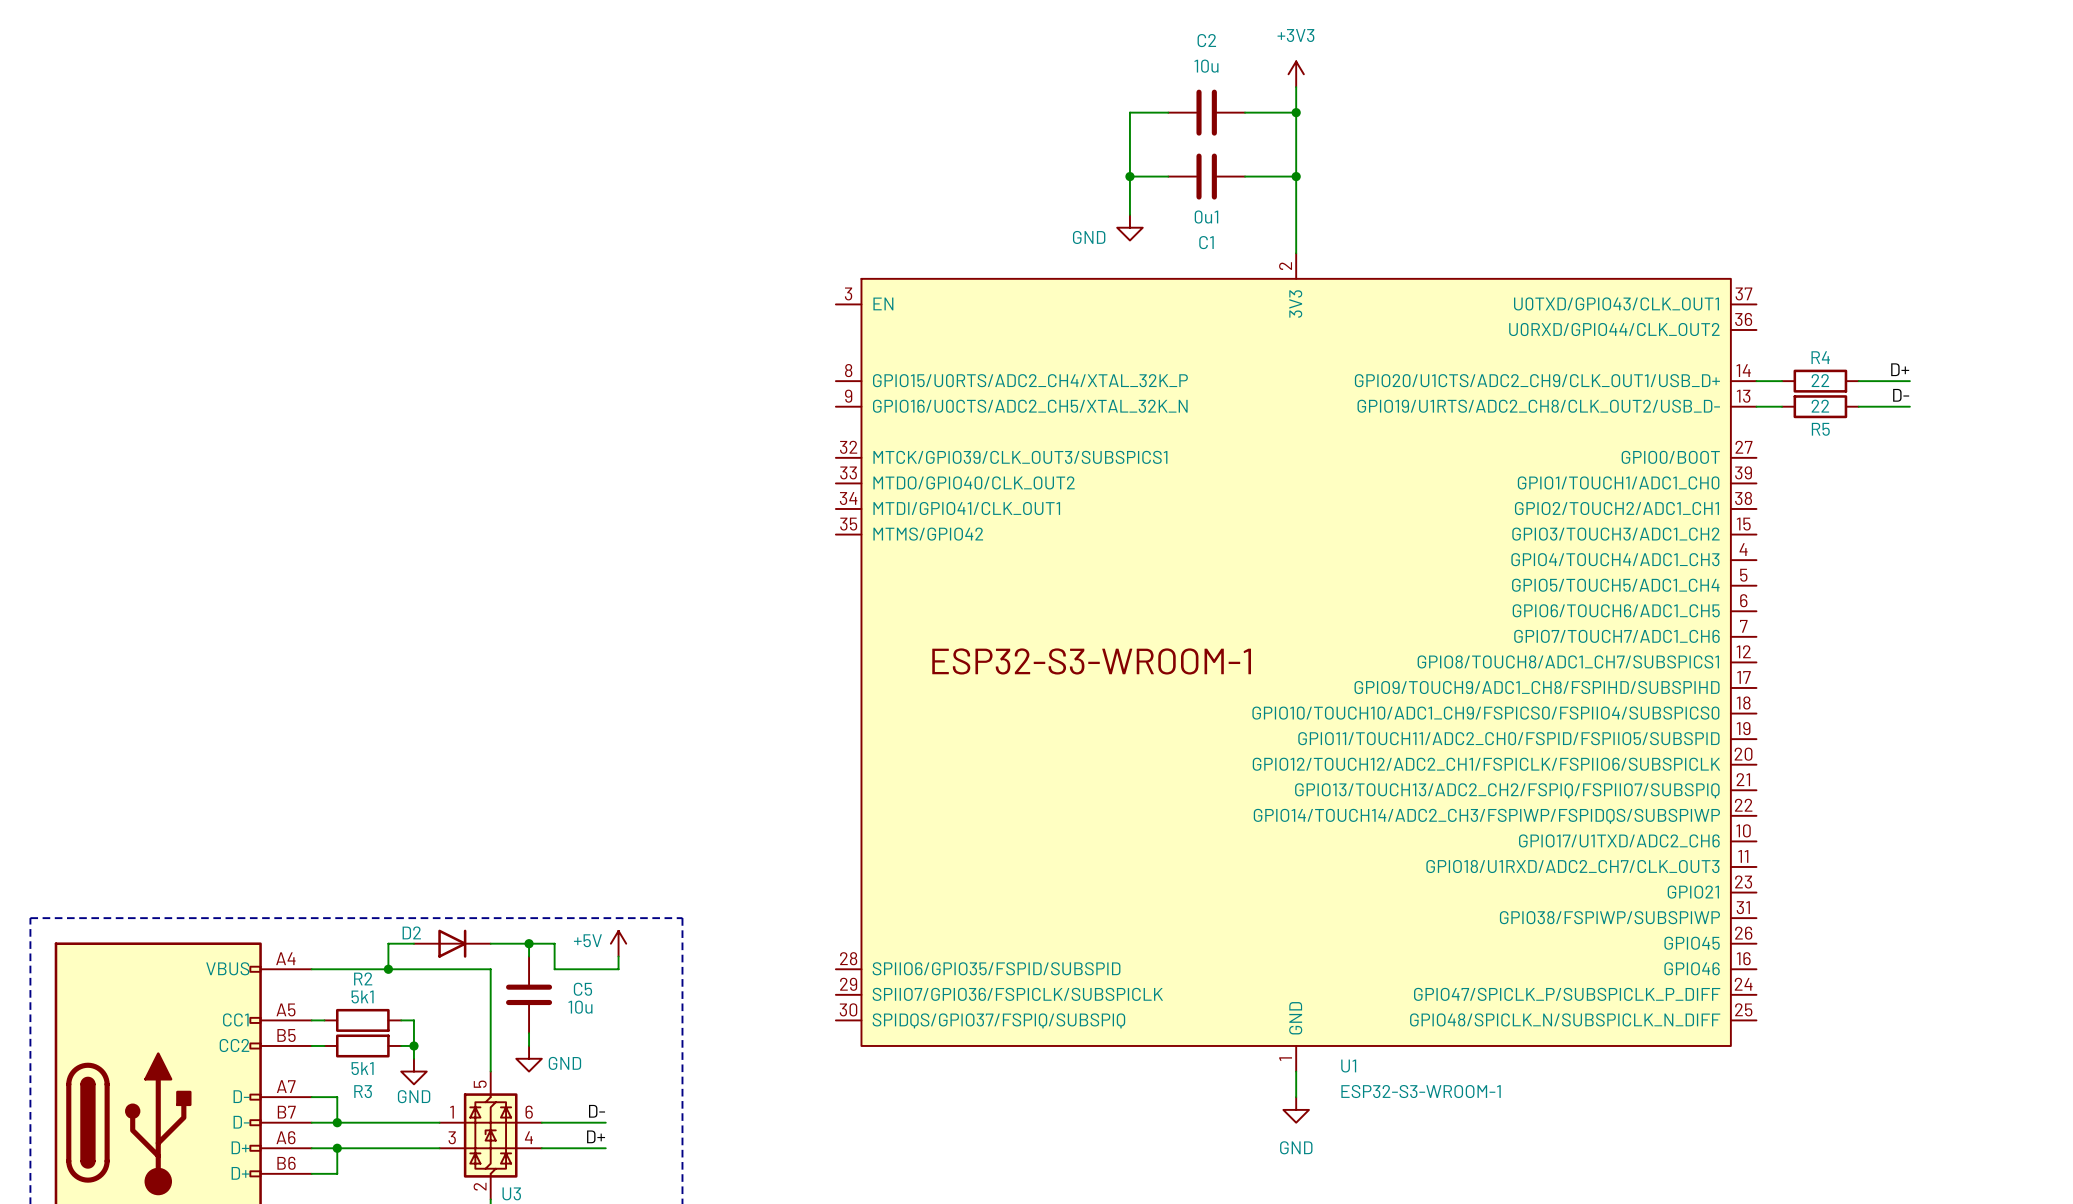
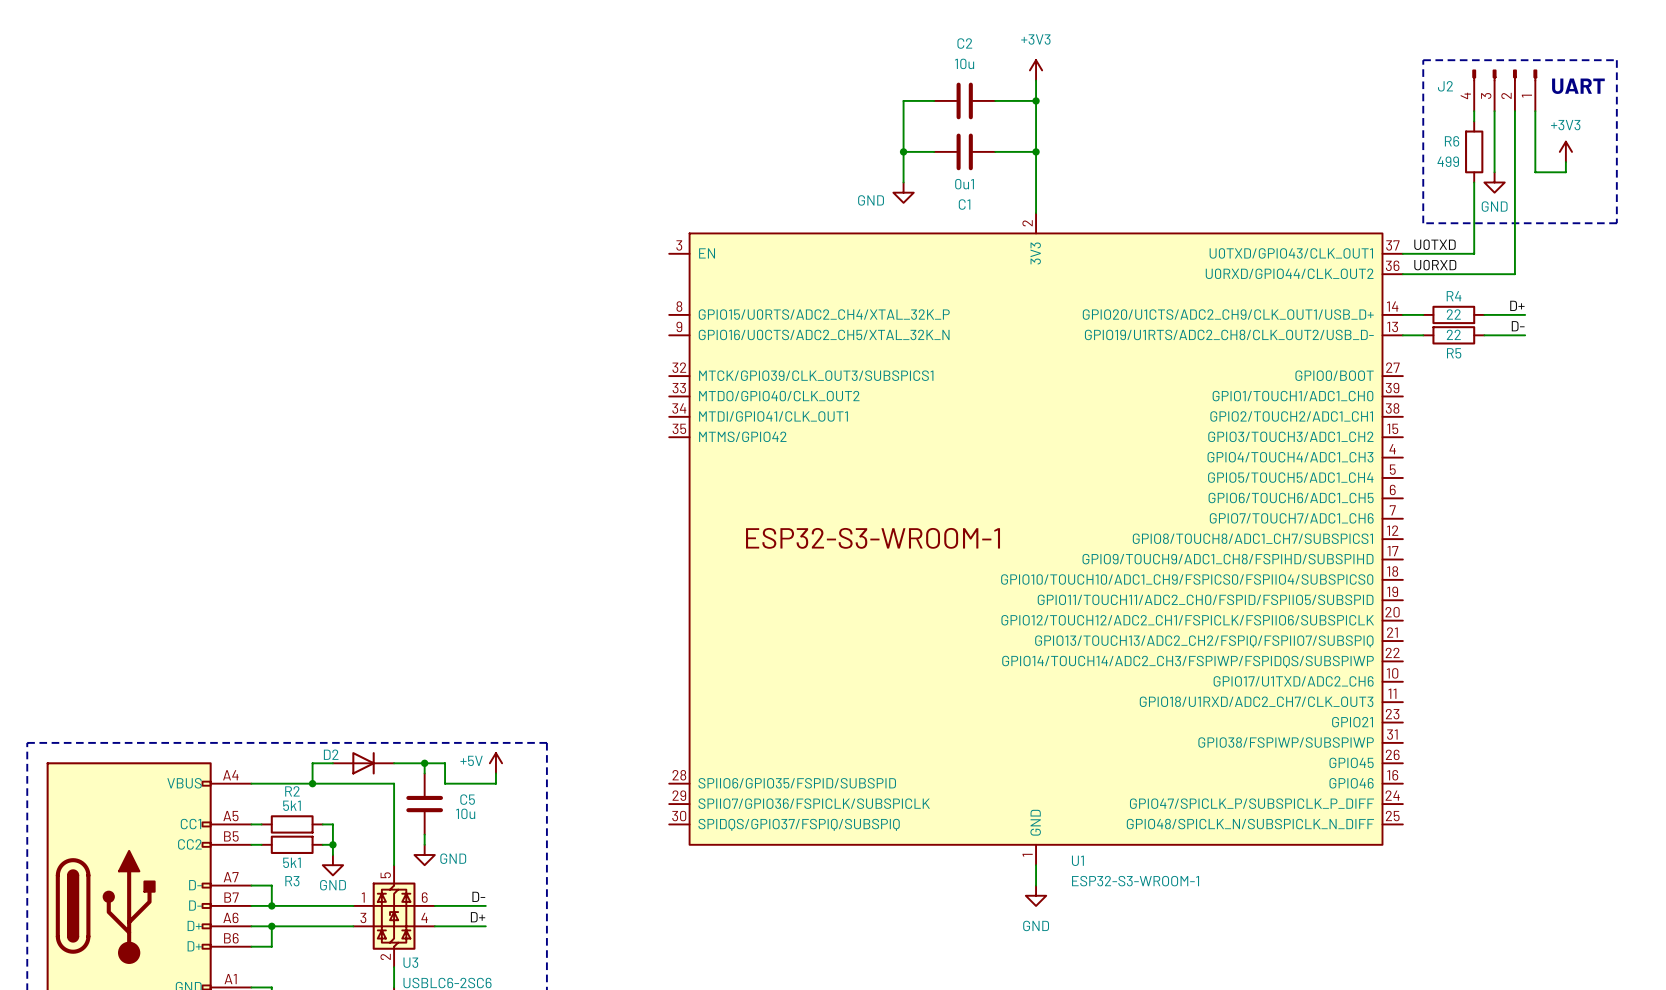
line: none -> (1423, 60) (1616, 60) (1616, 223) (1423, 223) (1423, 60)
text: none -> UART (1578, 86)
J2: none -> (1504, 90)
wire: none -> (1474, 111) (1474, 121)
wire: none -> (1494, 111) (1494, 172)
wire: none -> (1514, 111) (1514, 274) (1402, 274)
wire: none -> (1535, 111) (1535, 172) (1565, 172) (1565, 162)
R6: none -> 499 (1474, 151)
power symbol: none -> +3V3 (1565, 151)
wire: none -> (1474, 182) (1474, 253) (1402, 253)
power symbol: none -> GND (1494, 182)
label: none -> U0TXD (1434, 244)
label: none -> U0RXD (1435, 265)

